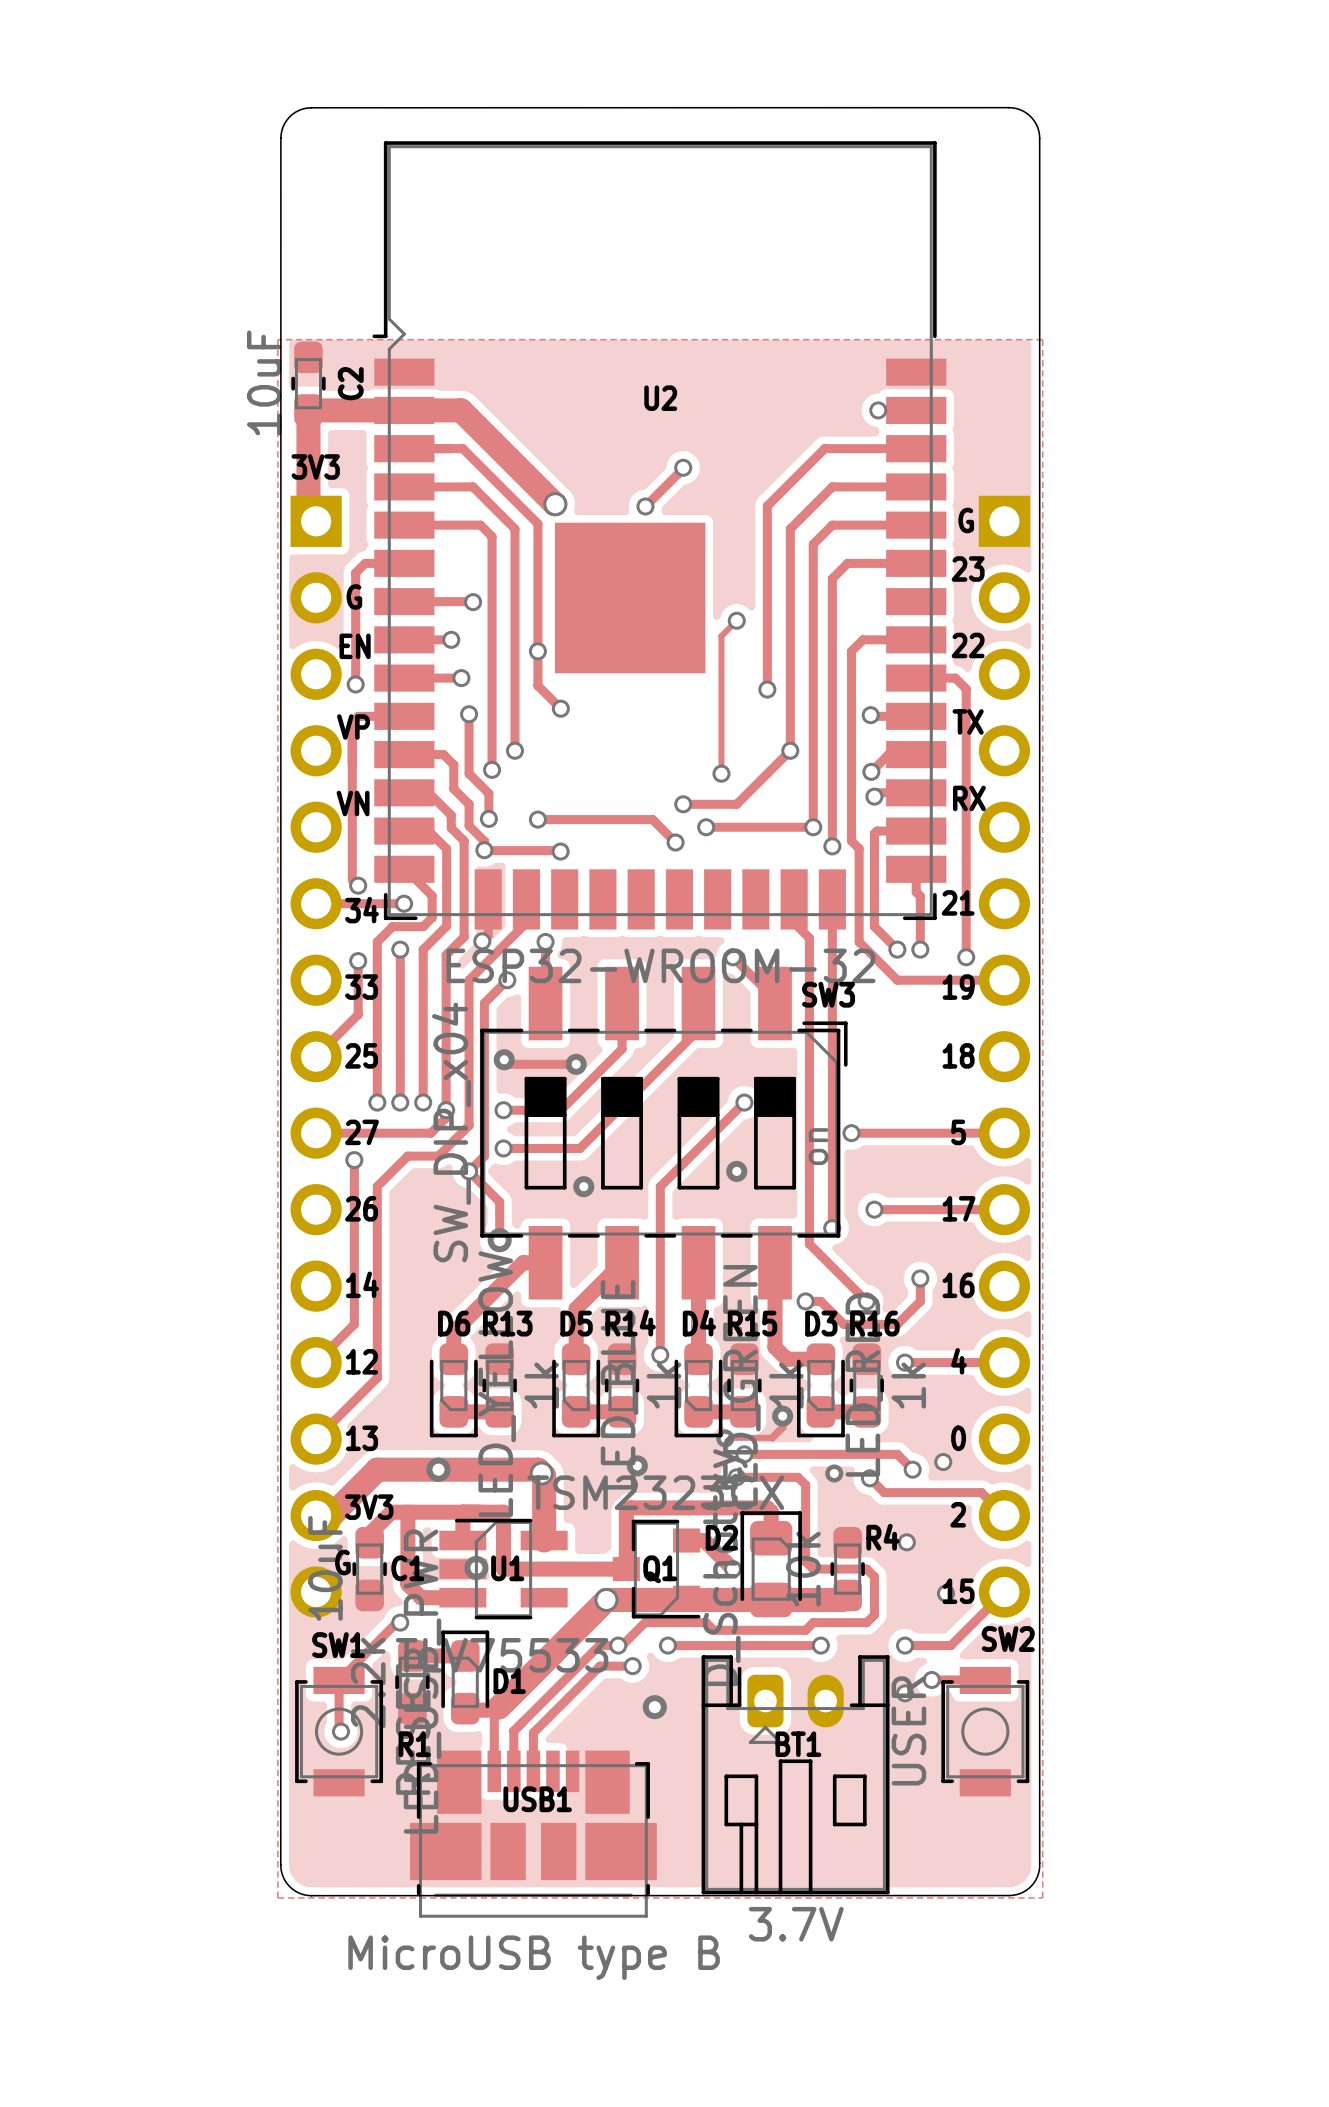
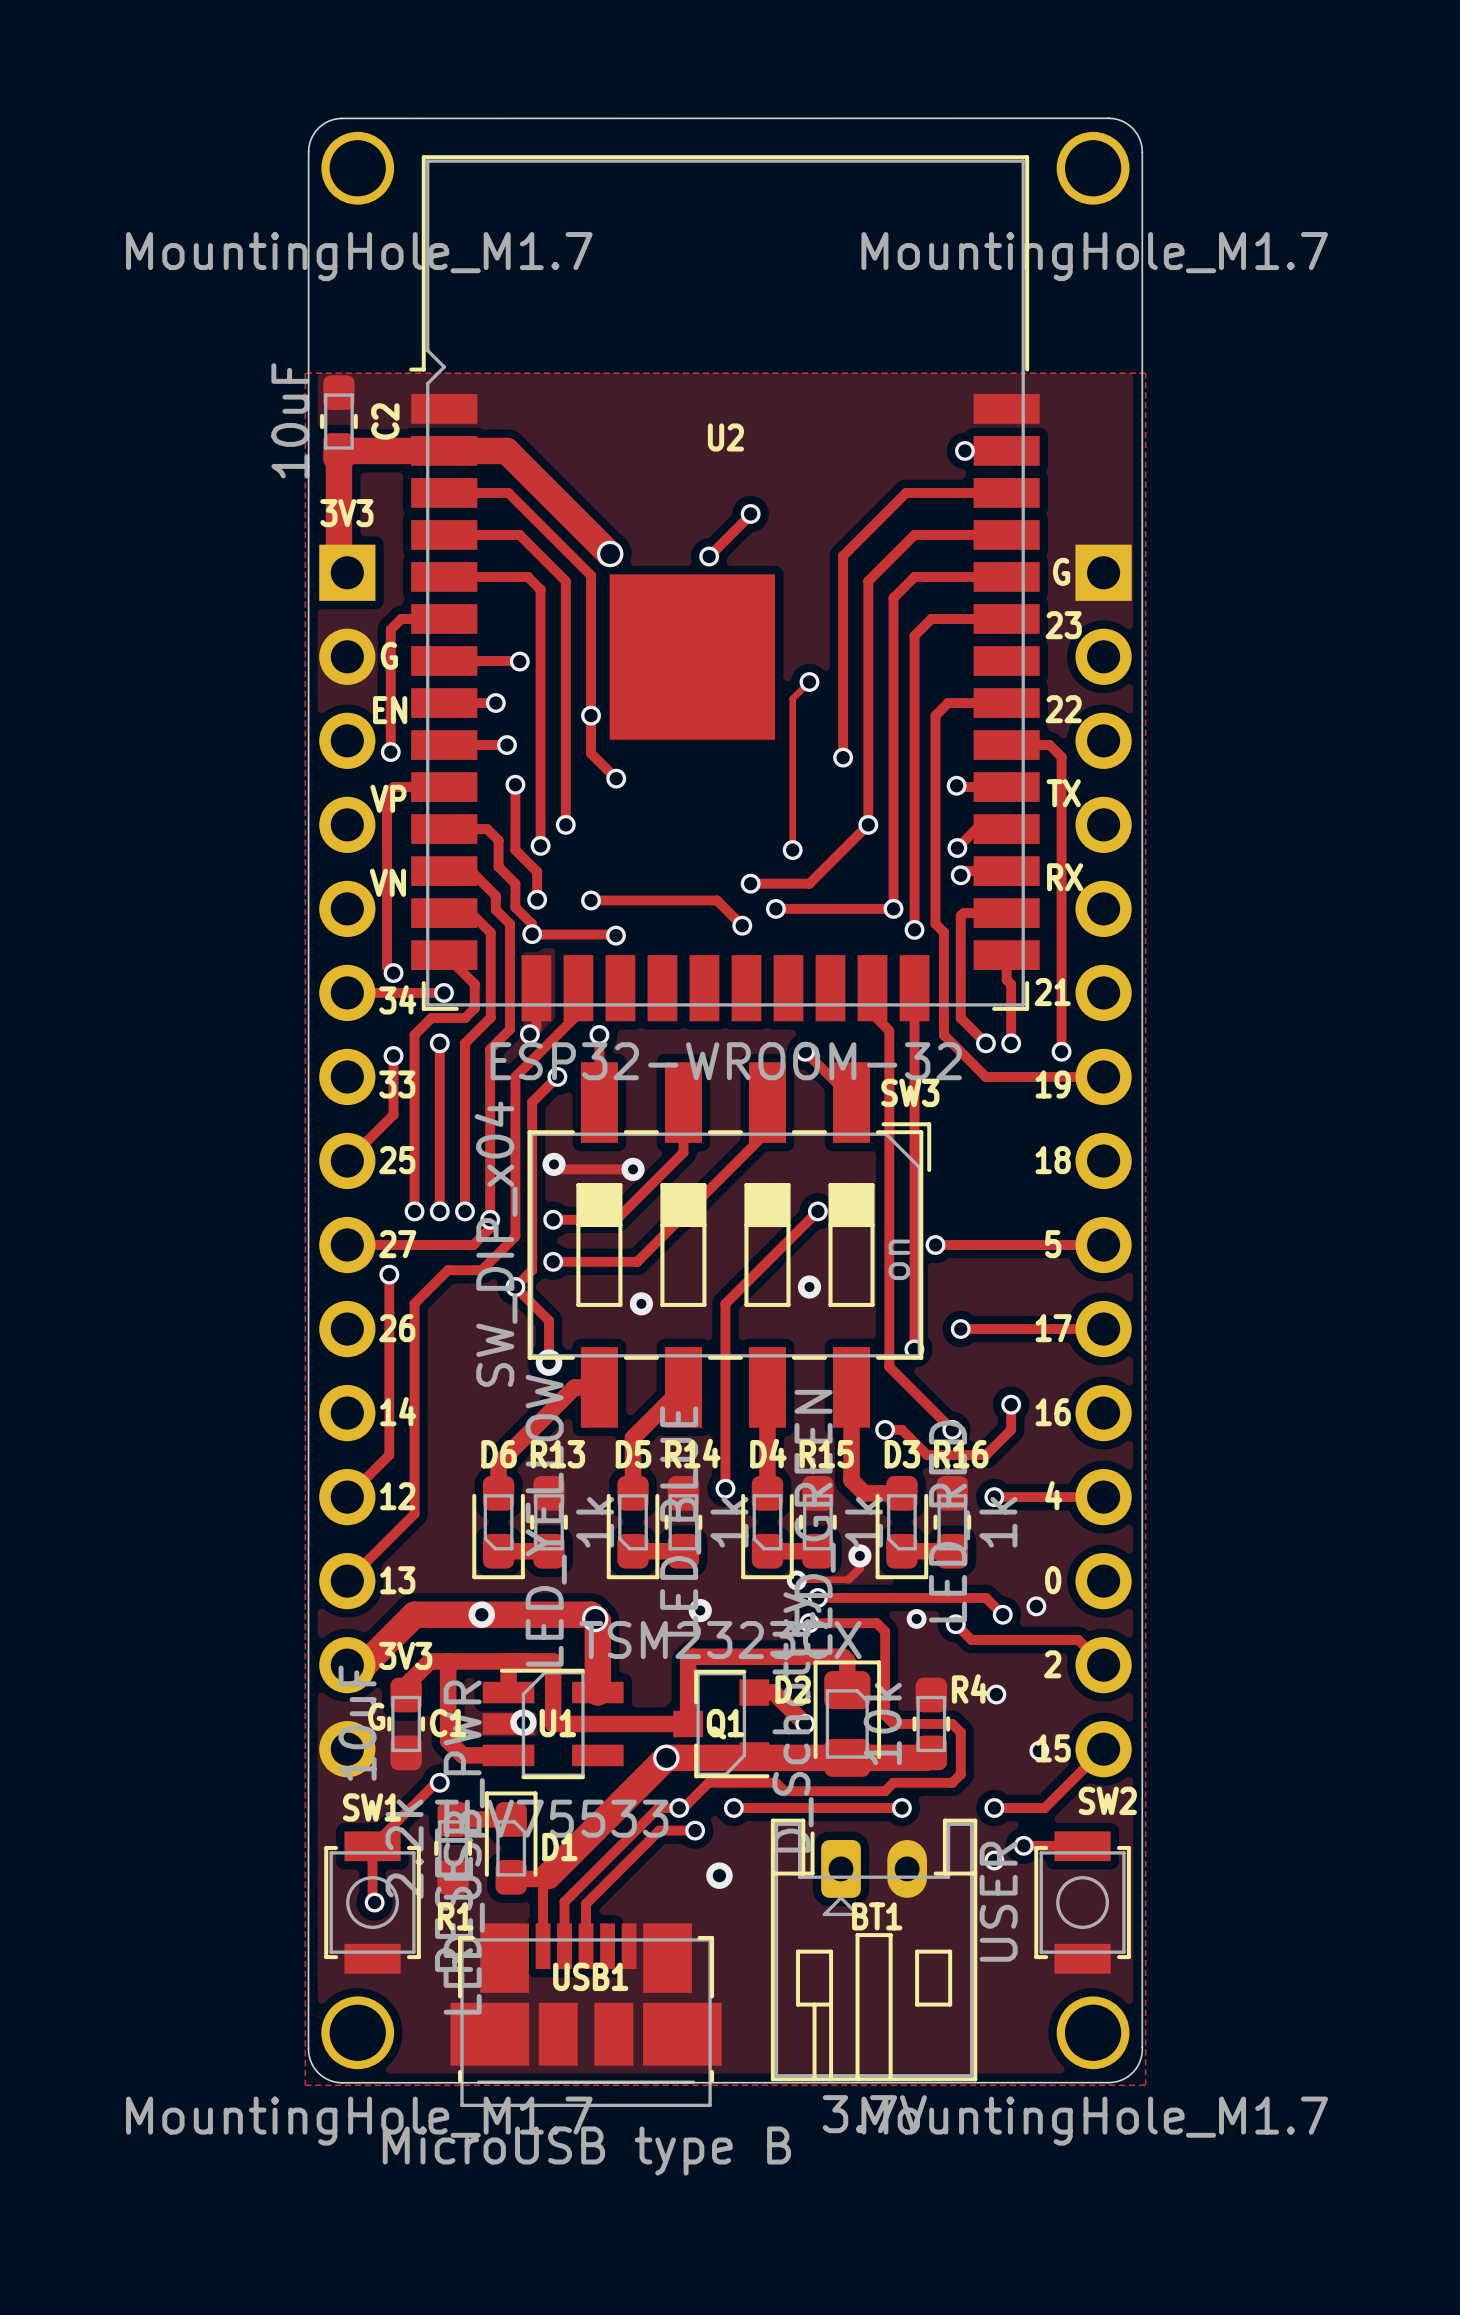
part: none -> MountingHole_M1.7 (357, 168)
part: none -> MountingHole_M1.7 (1093, 168)
part: none -> MountingHole_M1.7 (357, 2032)
part: none -> MountingHole_M1.7 (1093, 2032)

